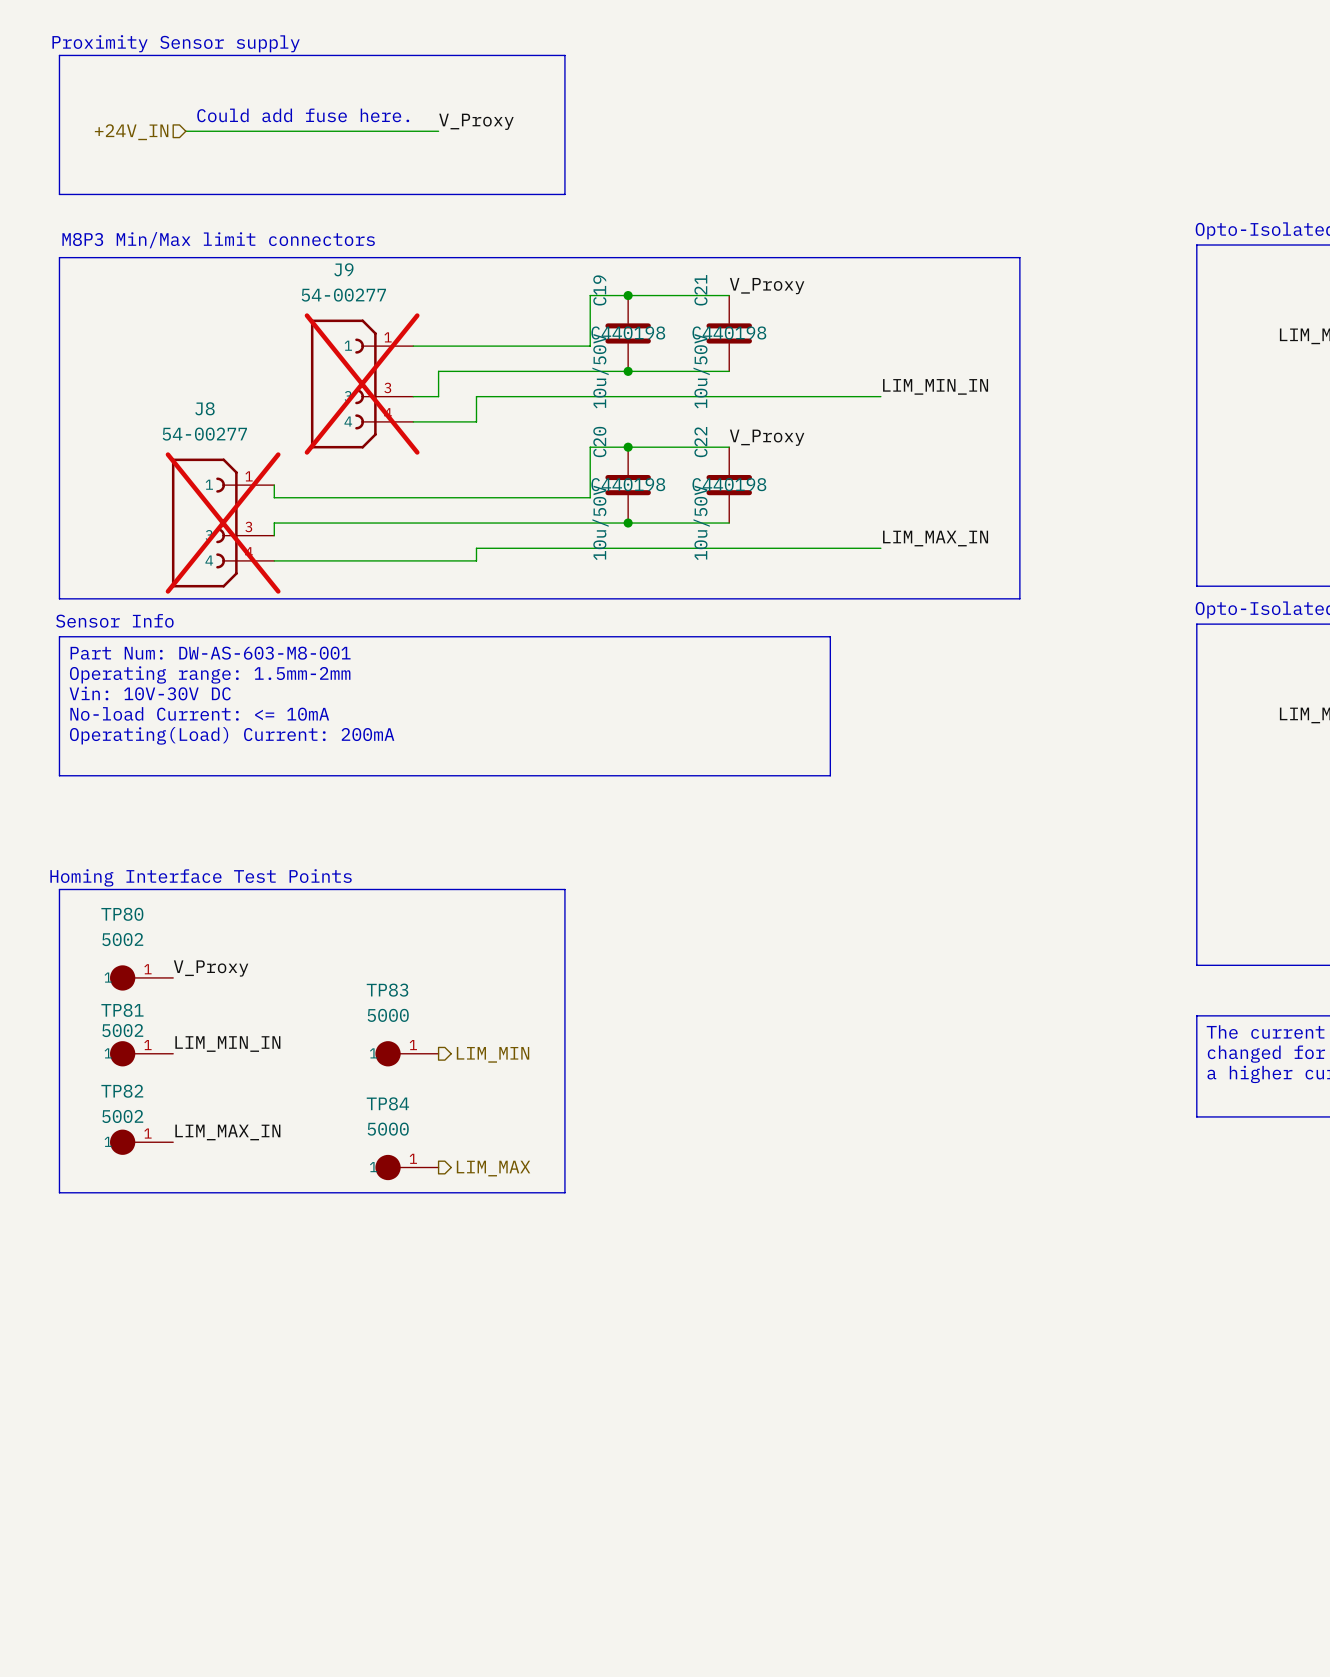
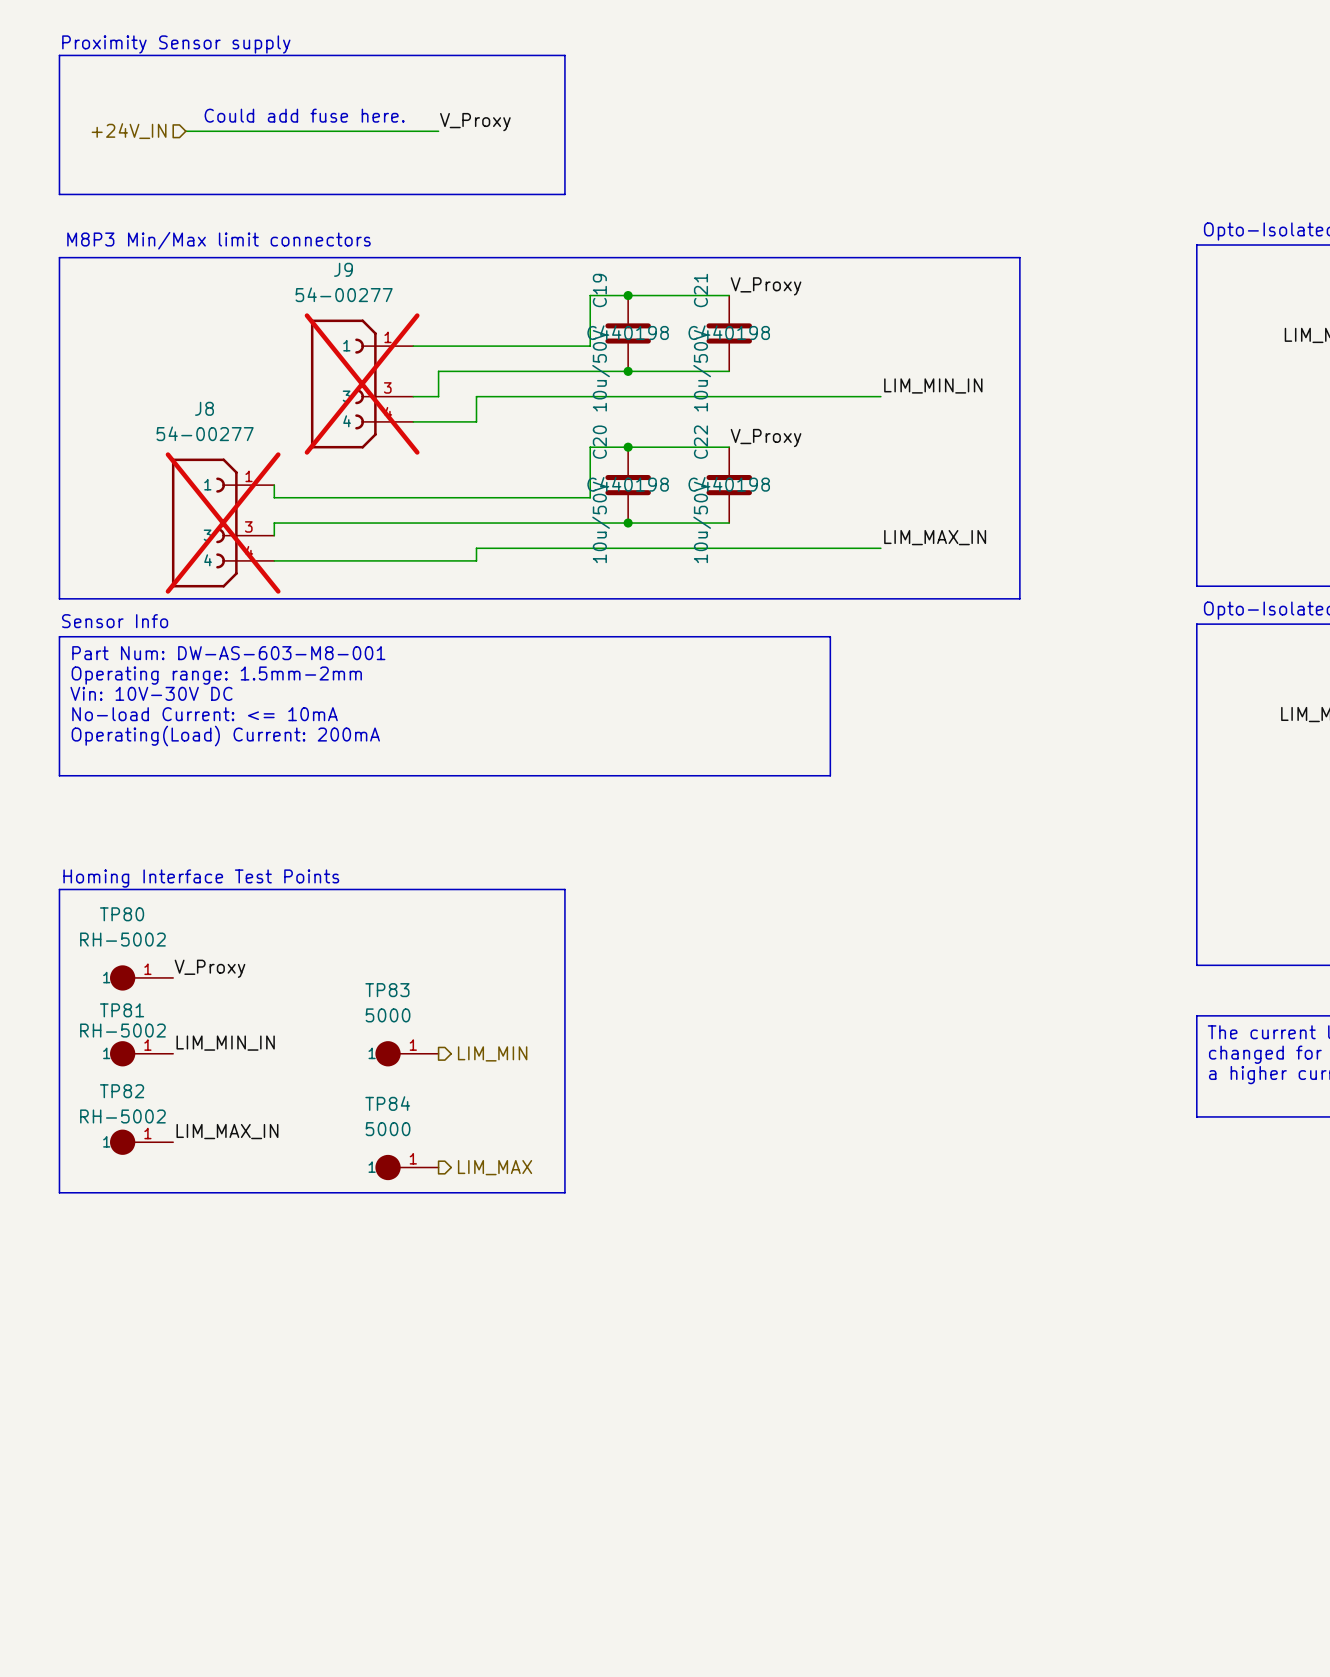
TP80 value: 5002 (122, 939) -> RH-5002 (122, 939)
TP81 value: 5002 (122, 1030) -> RH-5002 (122, 1030)
TP82 value: 5002 (122, 1116) -> RH-5002 (122, 1116)

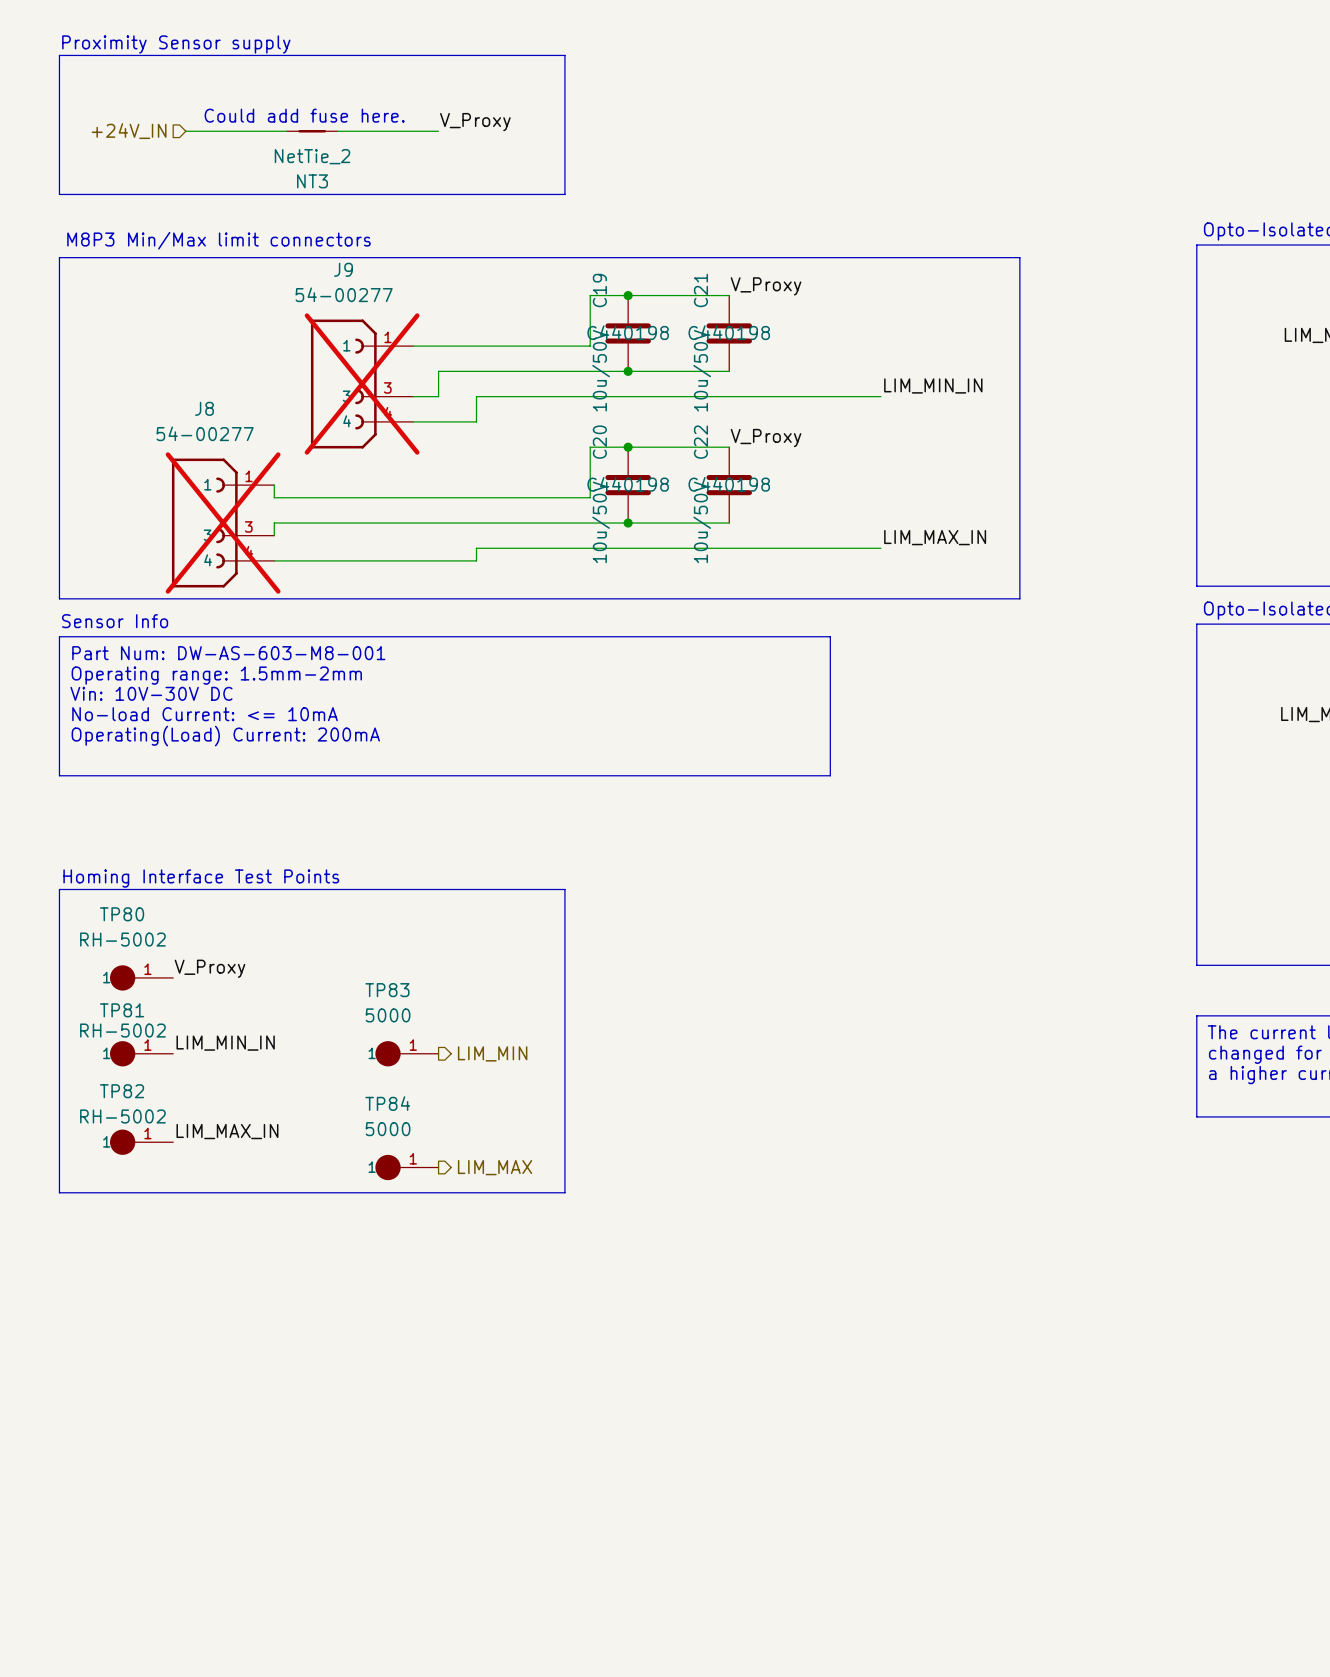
NT3: none -> NetTie_2 (312, 131)

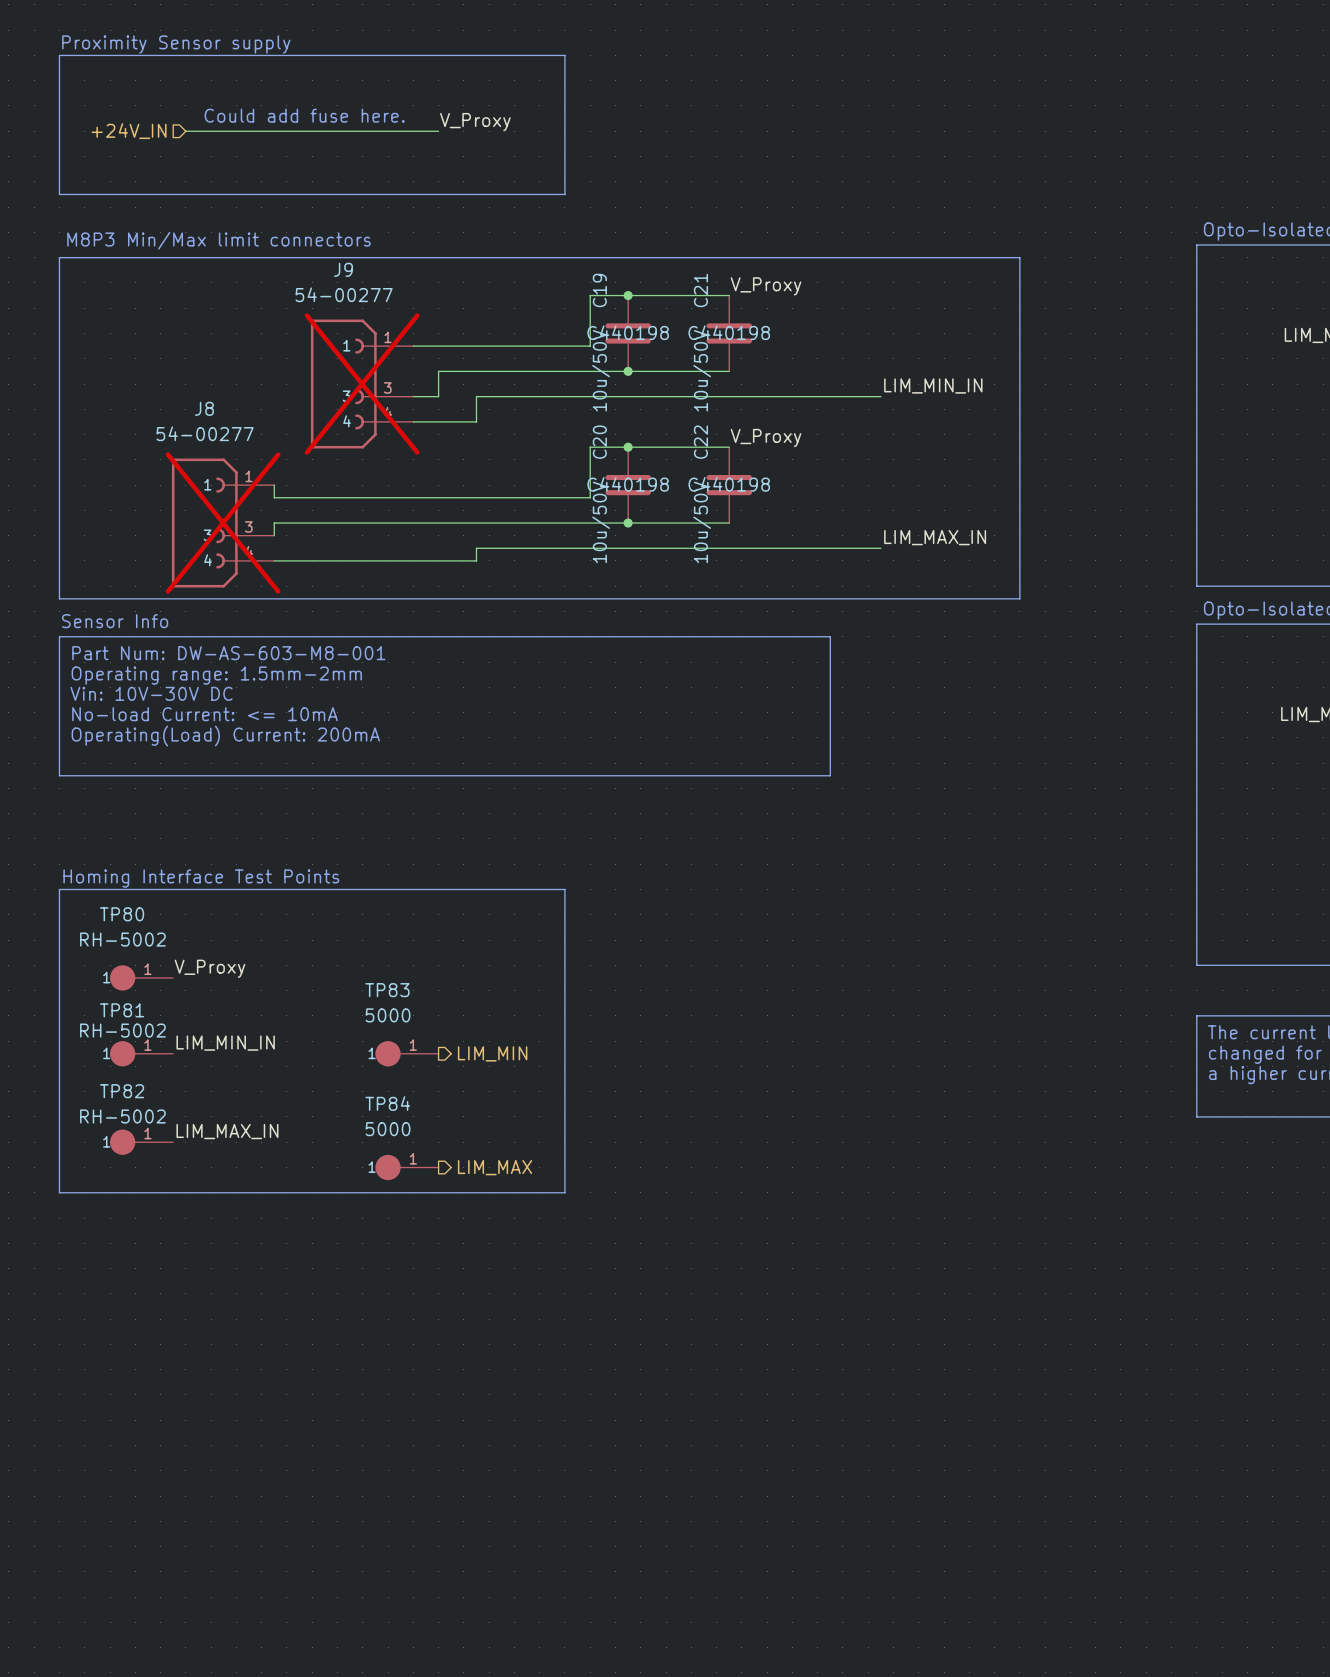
NT3: NetTie_2 (312, 131) -> none

